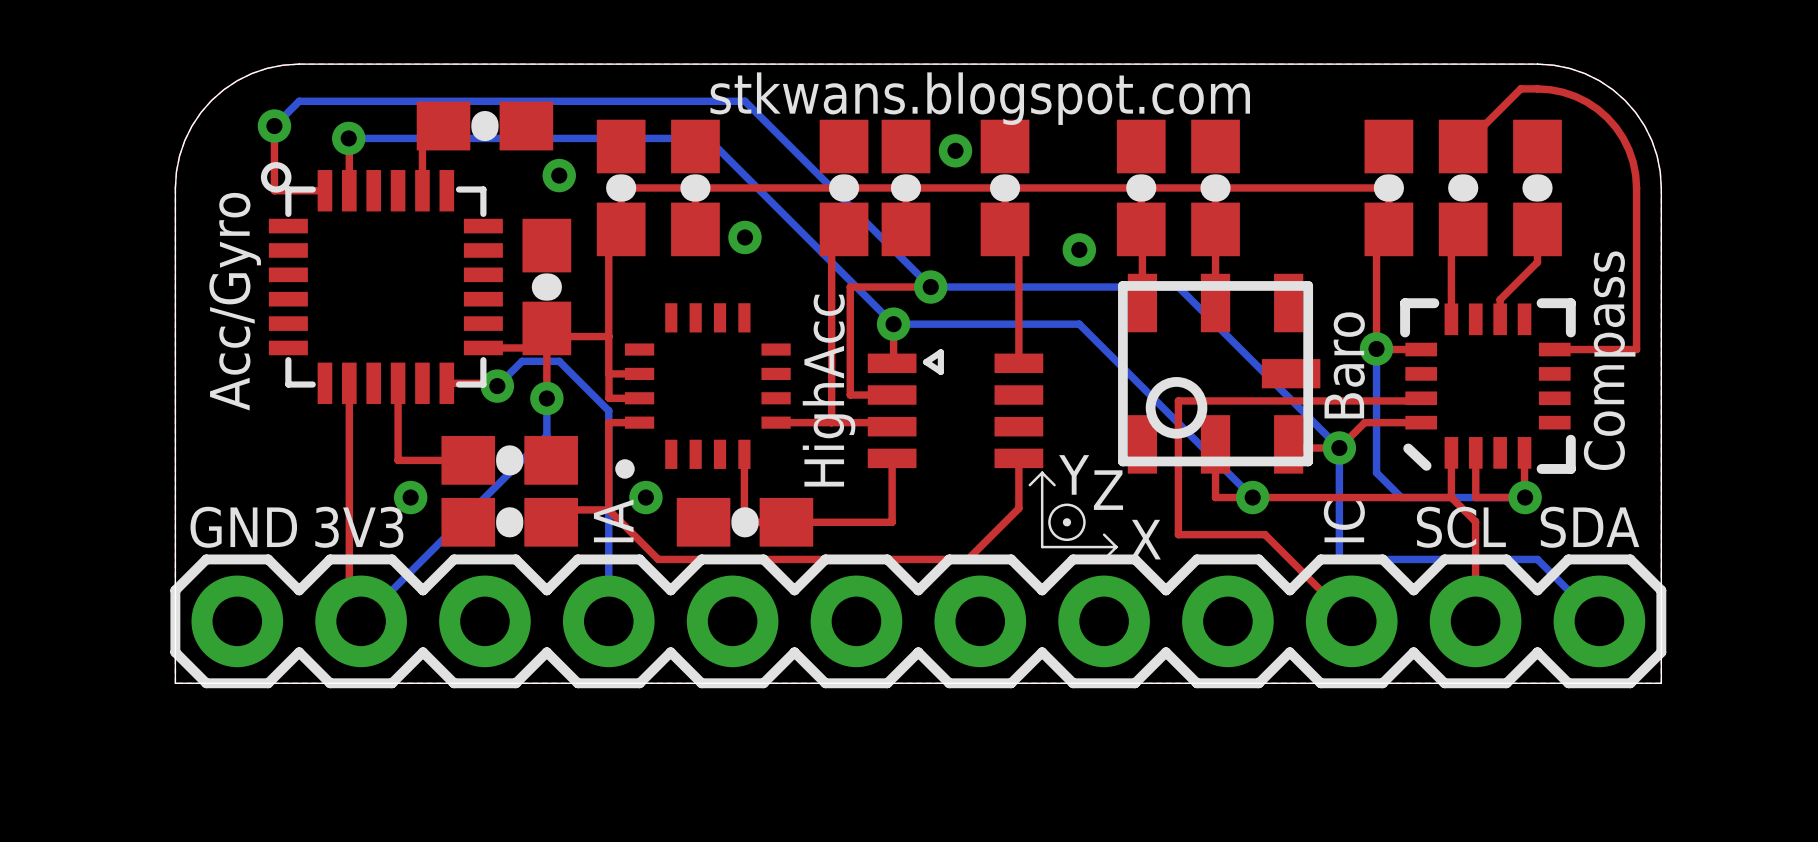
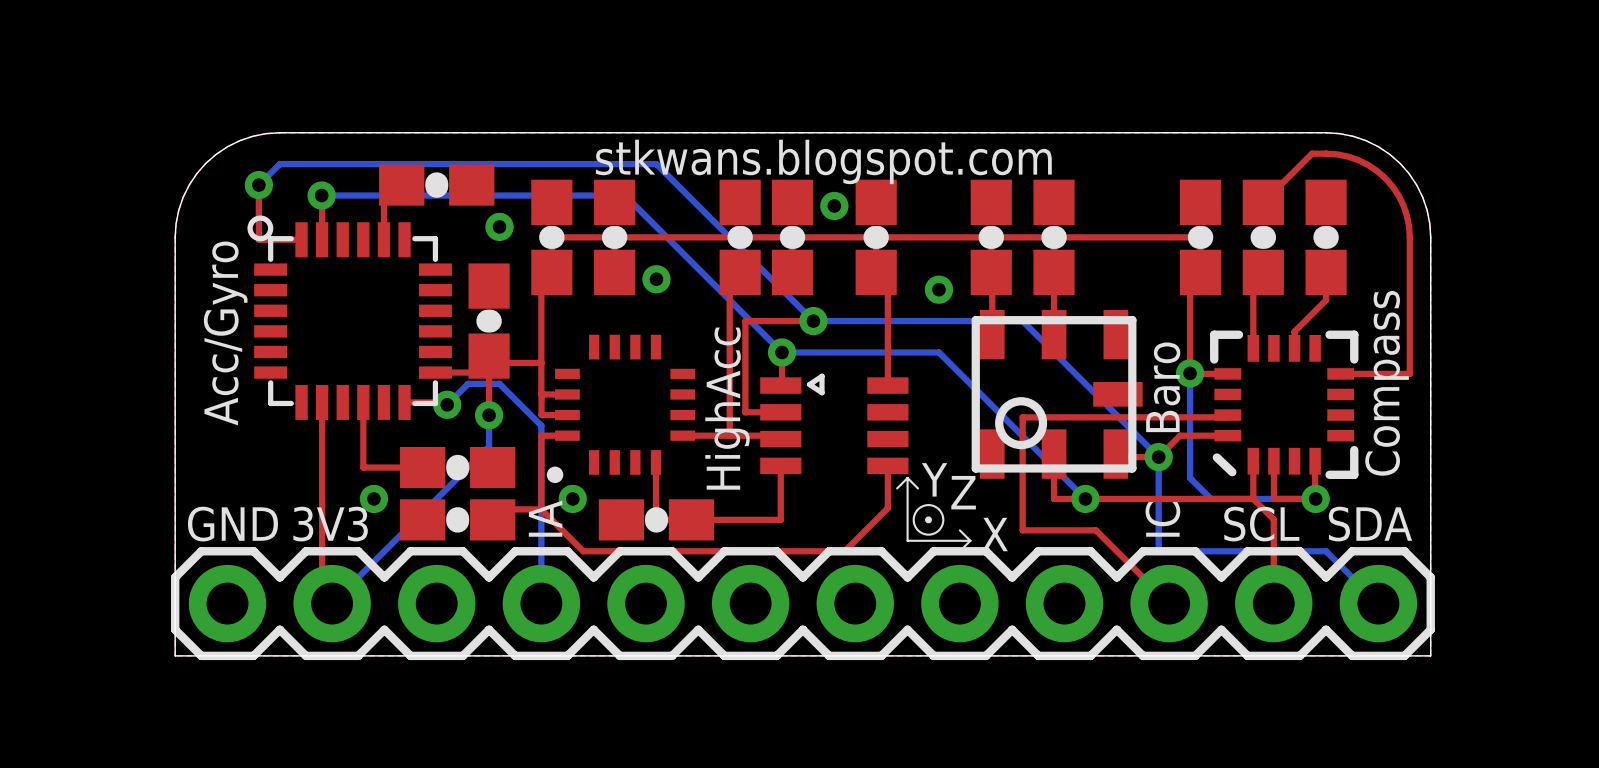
text position: stkwans.blogspot.com (980, 98) -> stkwans.blogspot.com (823, 161)

